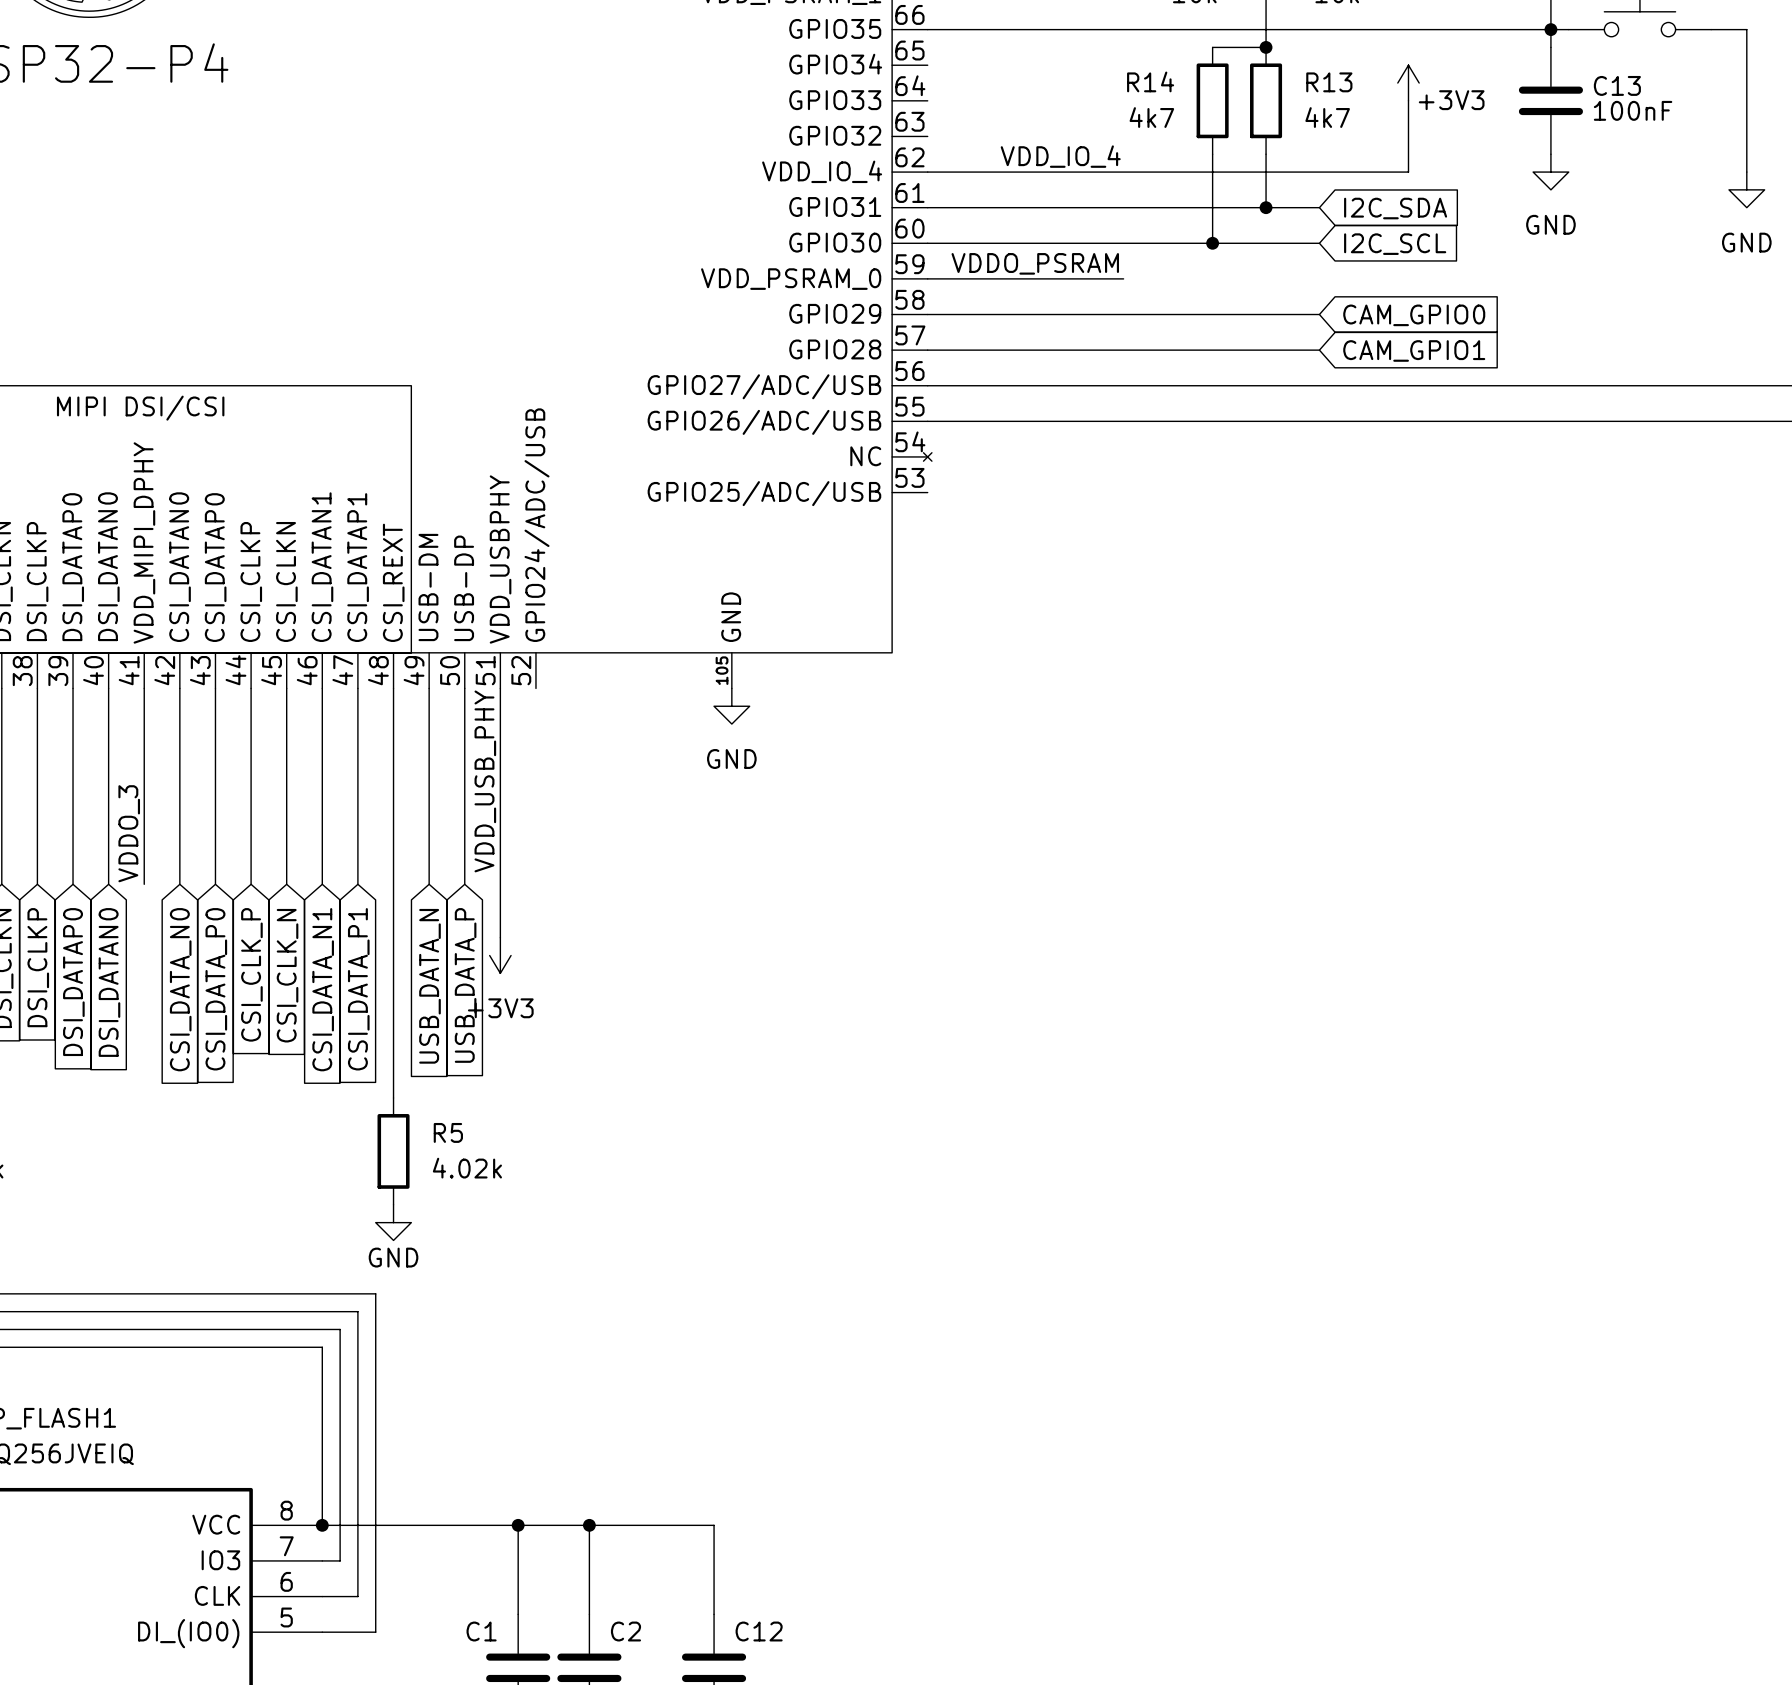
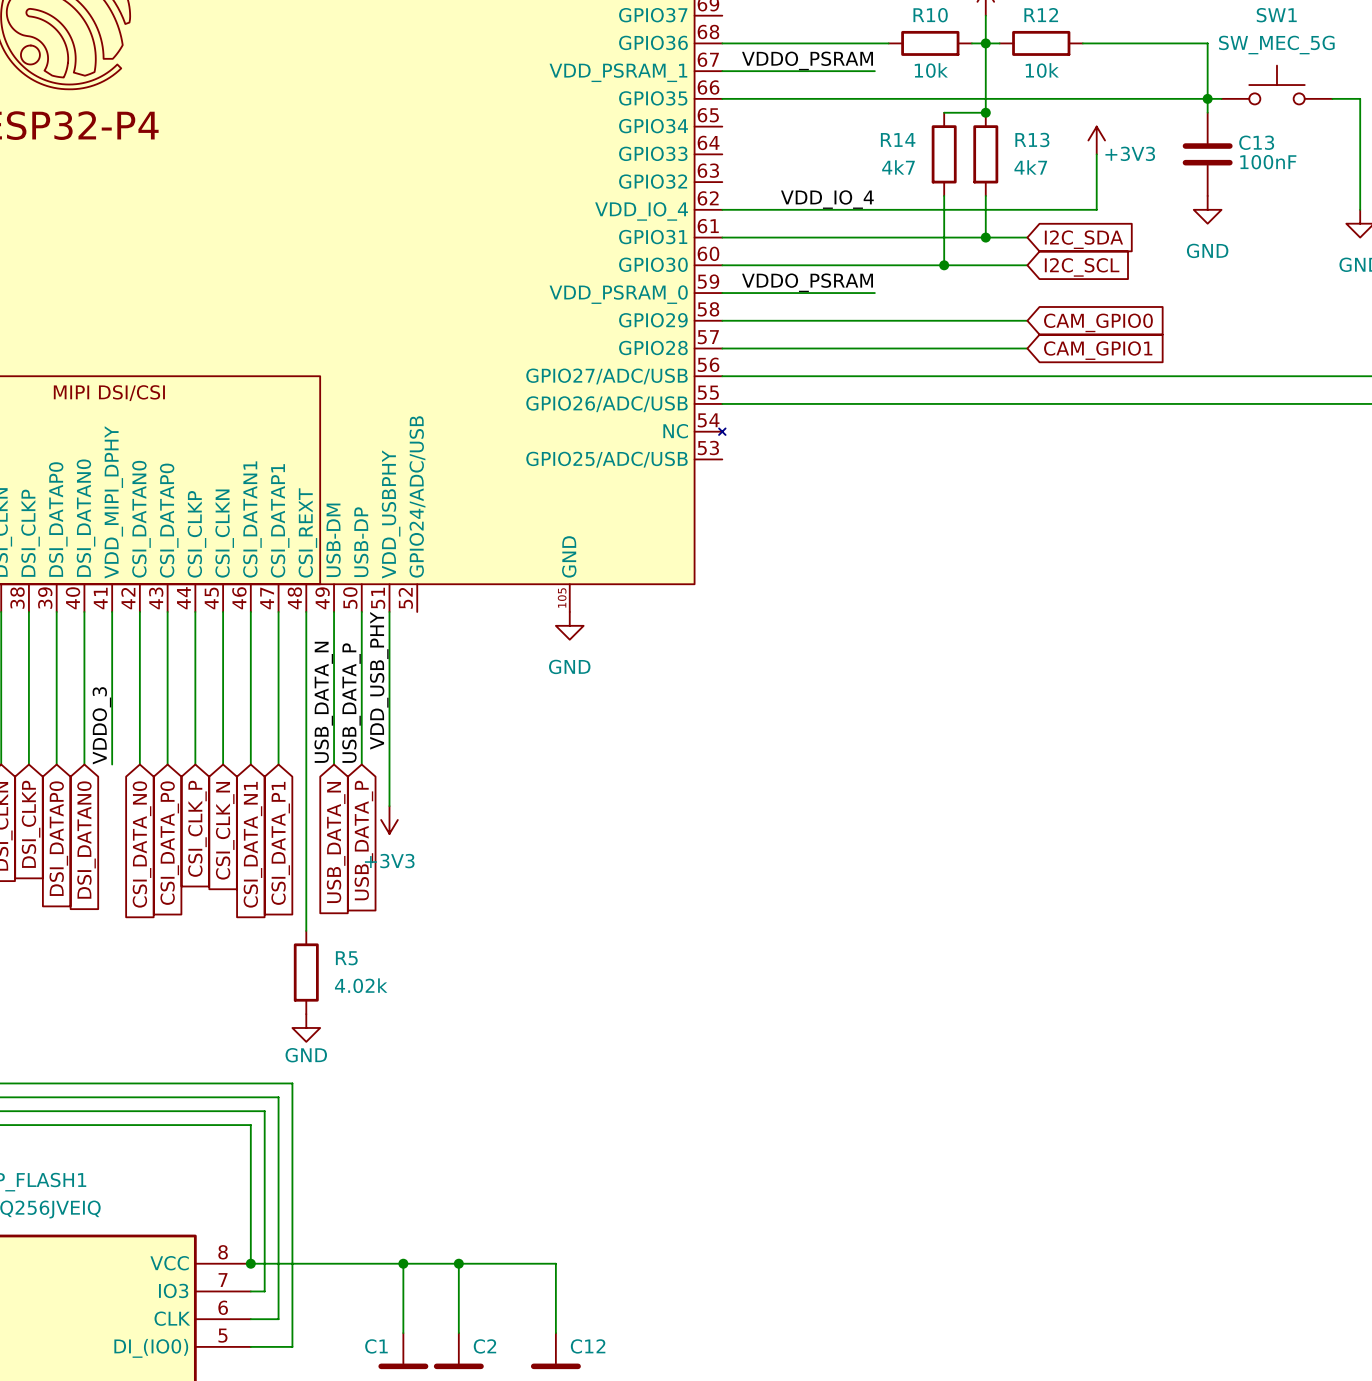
label: none -> USB_DATA_N (323, 702)
label: none -> USB_DATA_P (351, 703)

